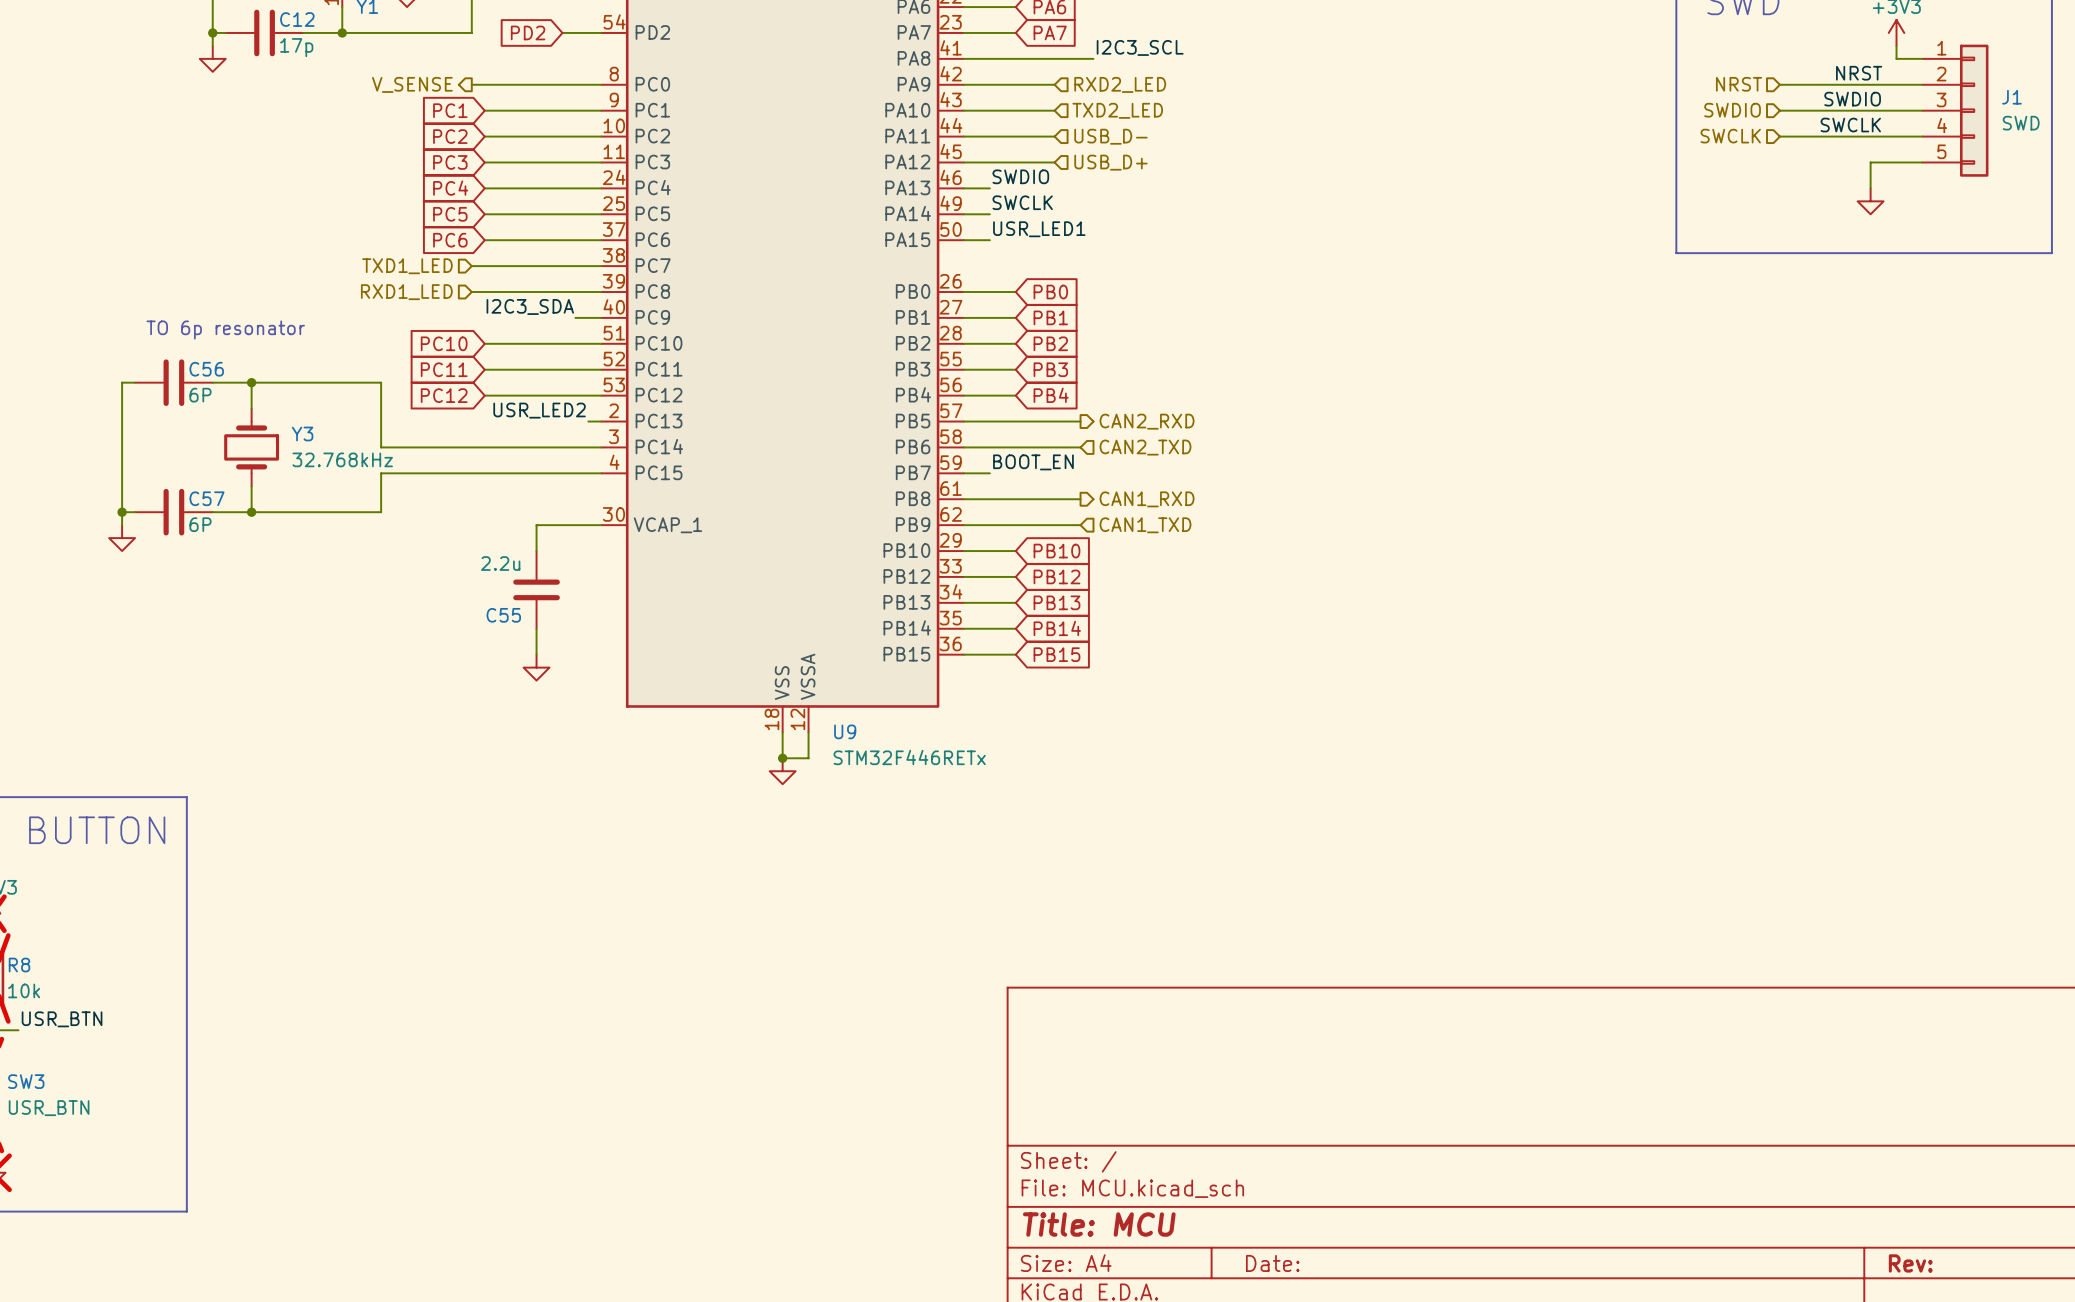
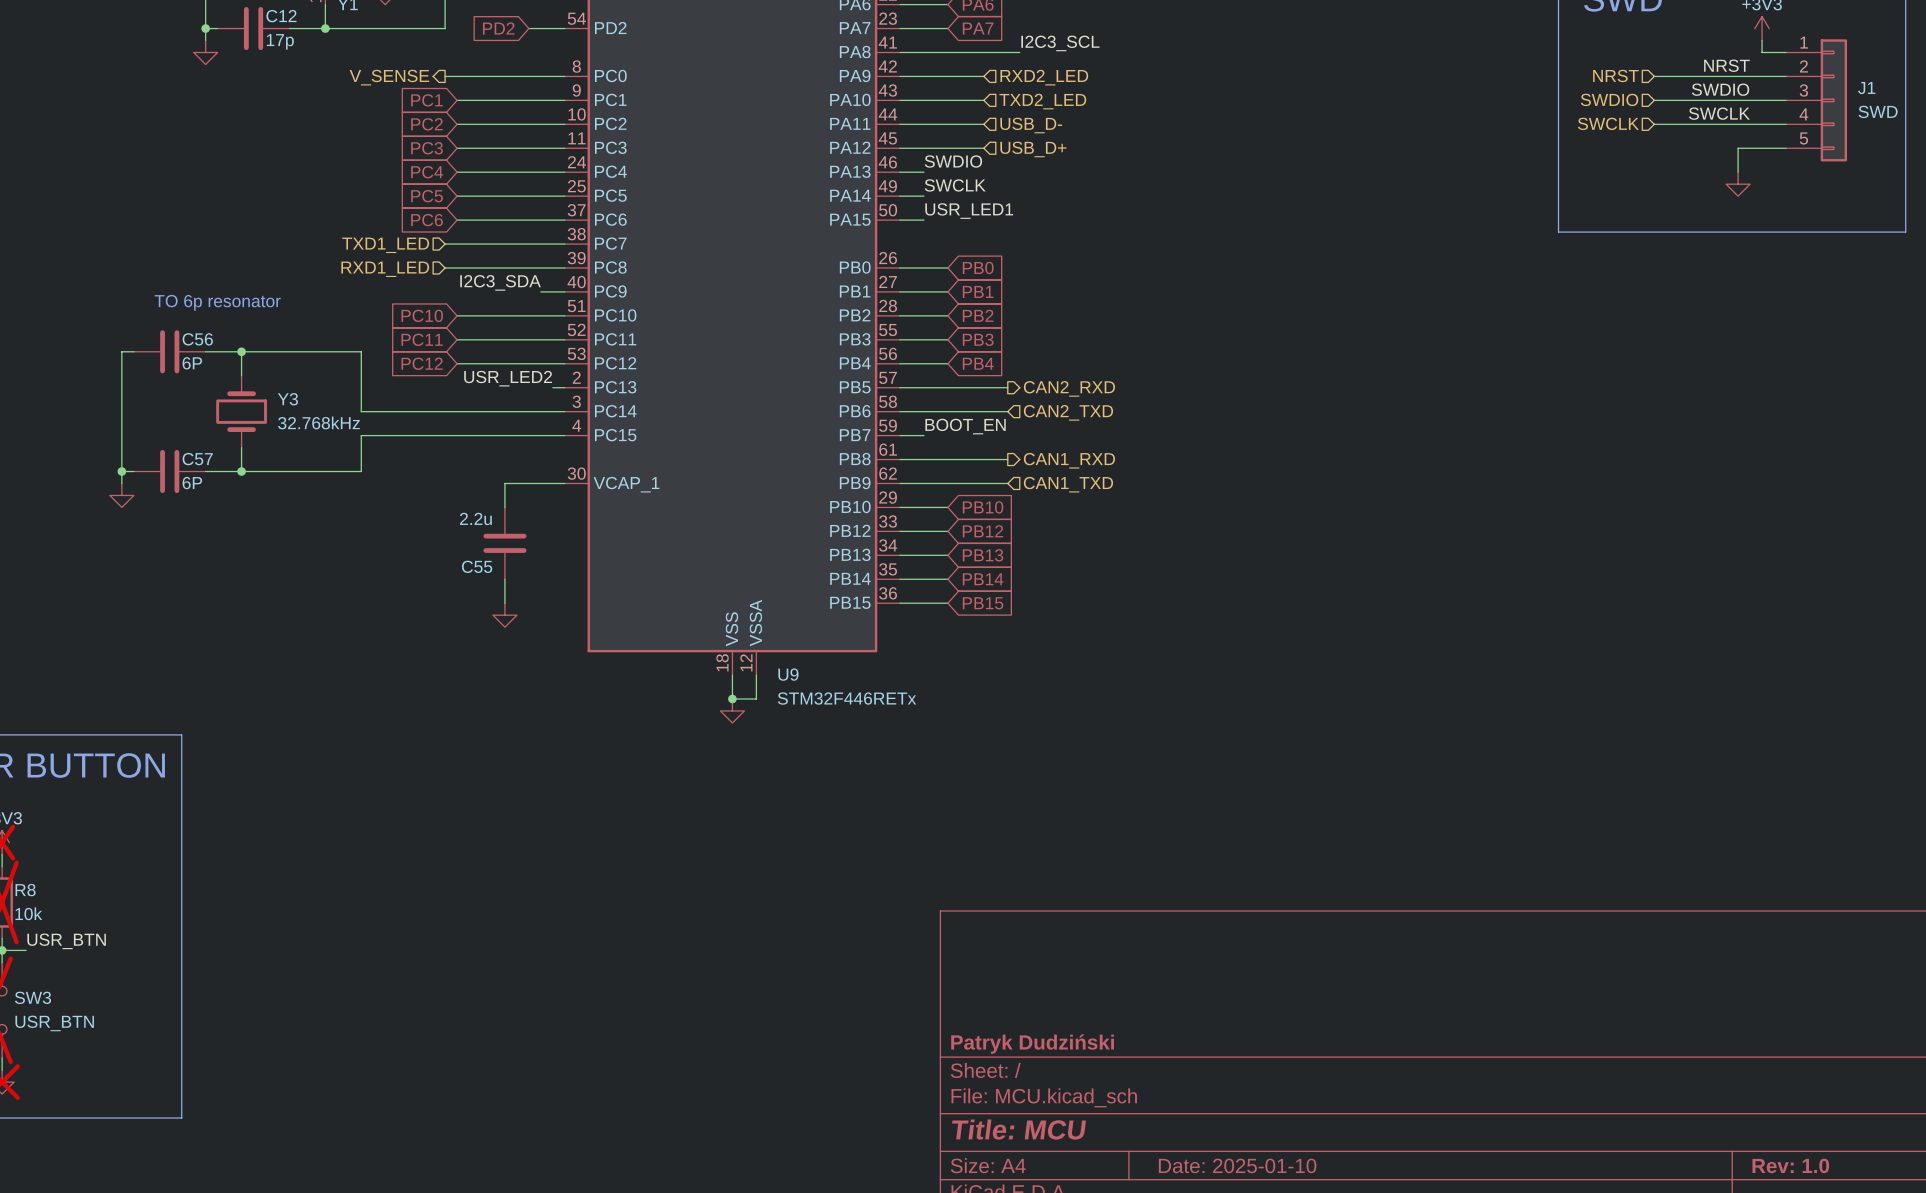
title block: none -> Patryk Dudziński (1032, 1044)
title block: Date: (1272, 1263) -> Date: 2025-01-10 (1237, 1165)
title block: Rev: (1910, 1263) -> Rev: 1.0 (1790, 1165)

